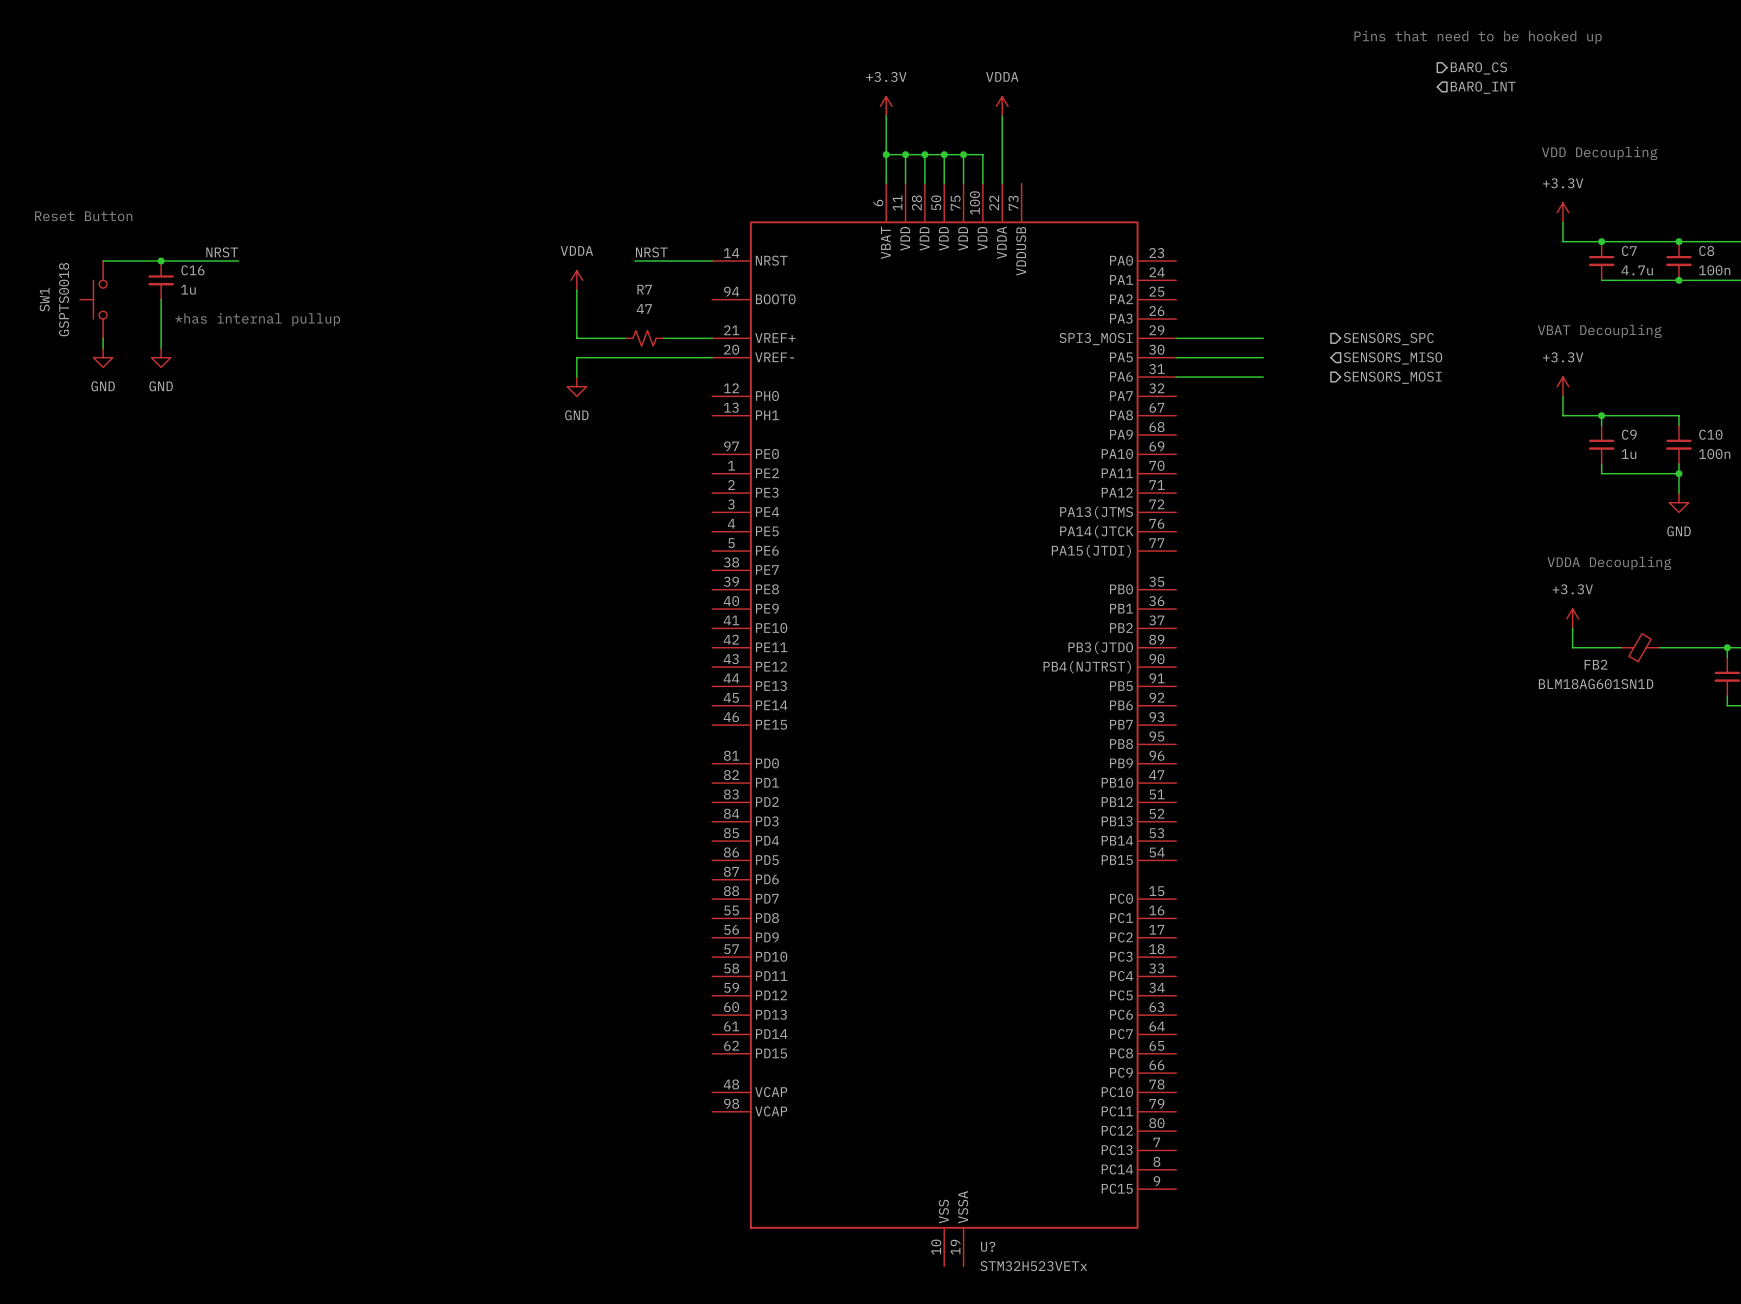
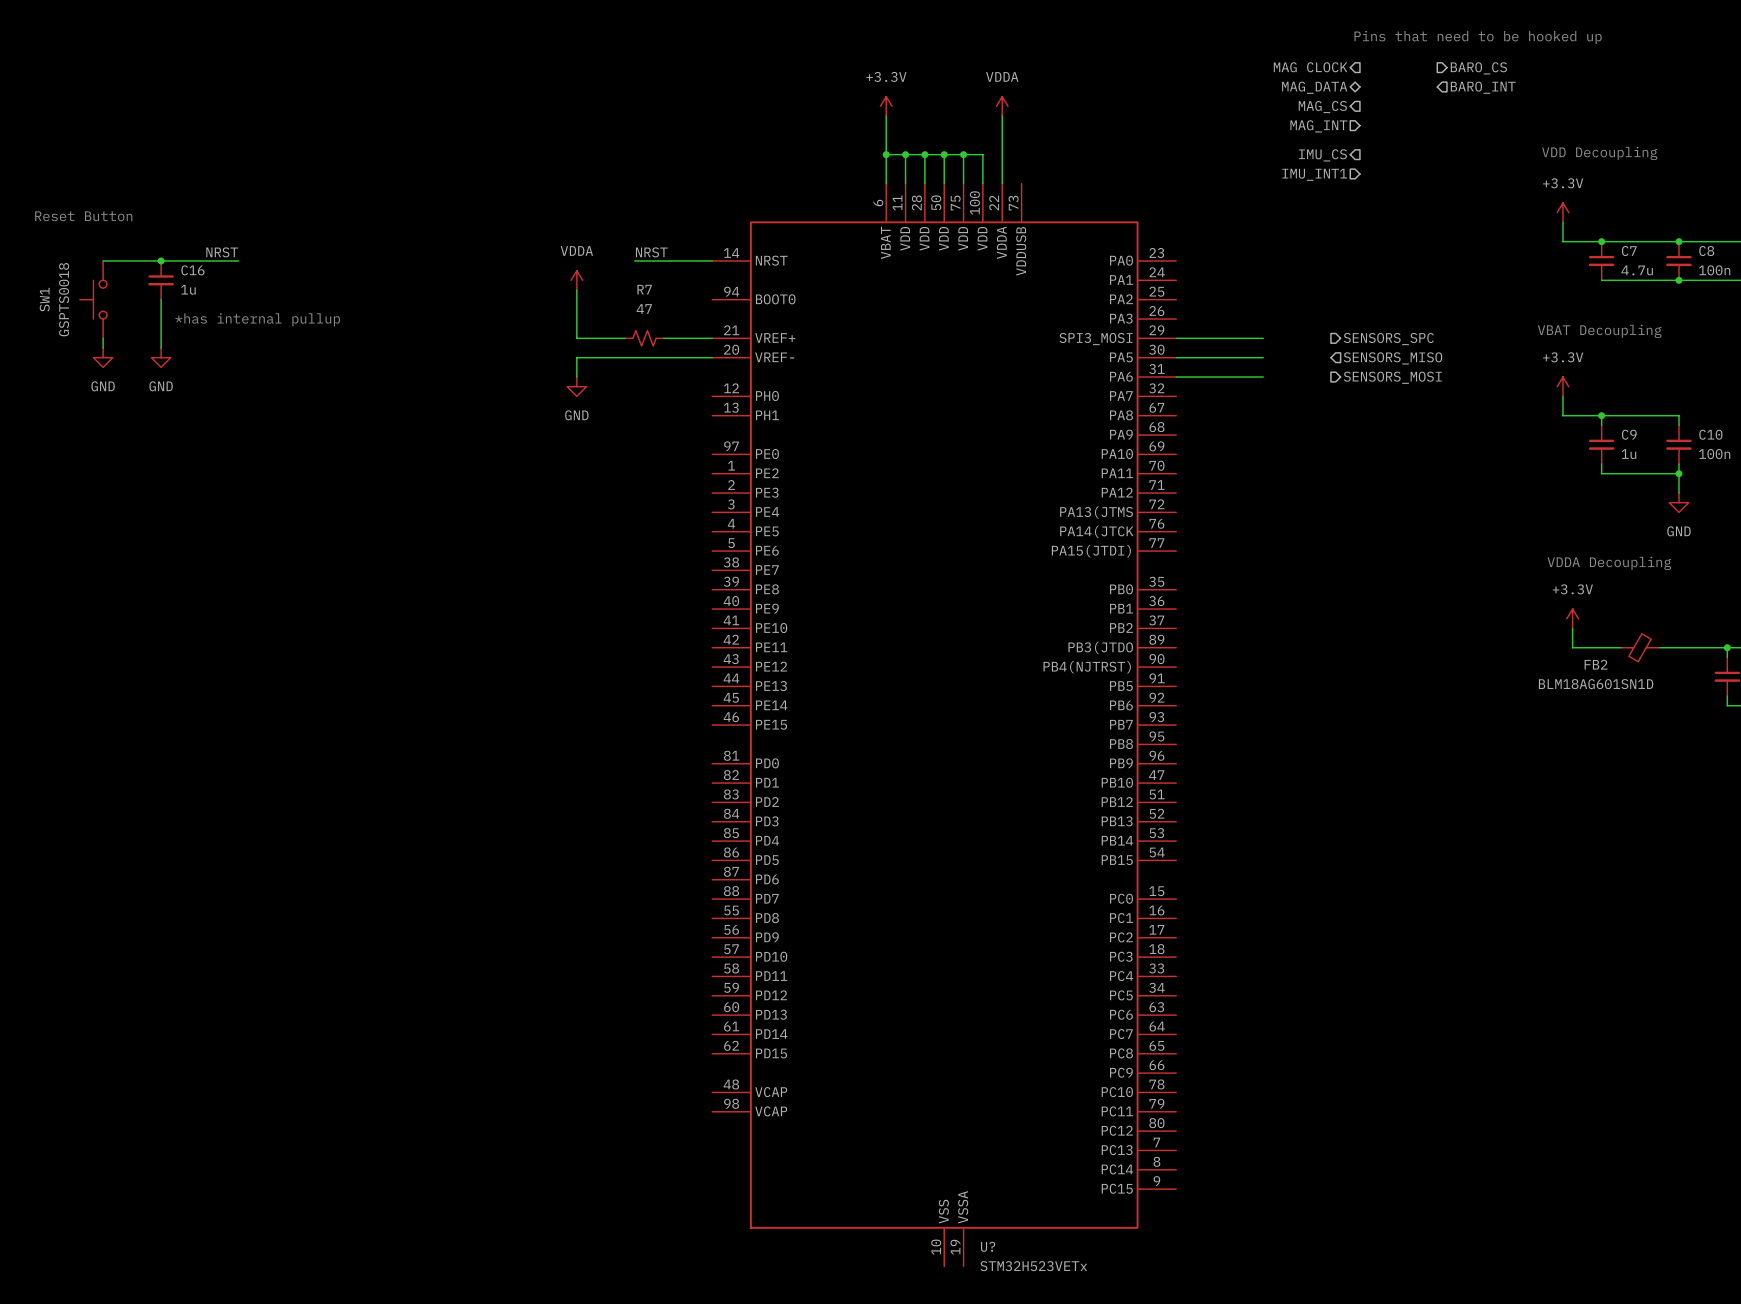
hierarchical label: none -> MAG CLOCK (1310, 67)
hierarchical label: none -> MAG_DATA (1314, 87)
hierarchical label: none -> MAG_CS (1322, 107)
hierarchical label: none -> MAG_INT (1318, 126)
hierarchical label: none -> IMU_CS (1322, 155)
hierarchical label: none -> IMU_INT1 (1314, 174)

